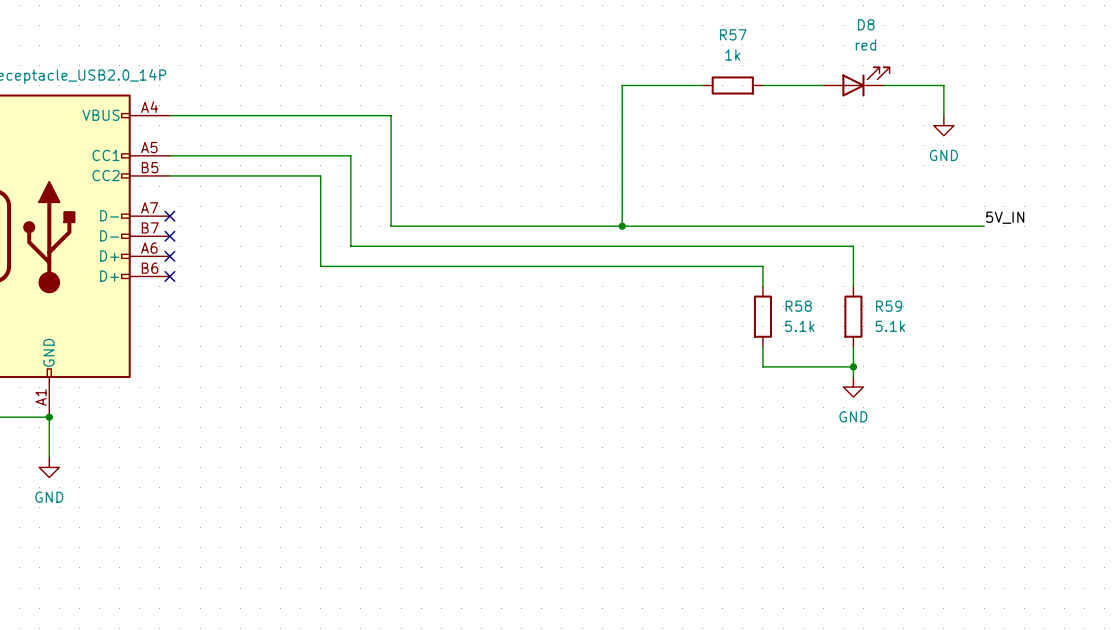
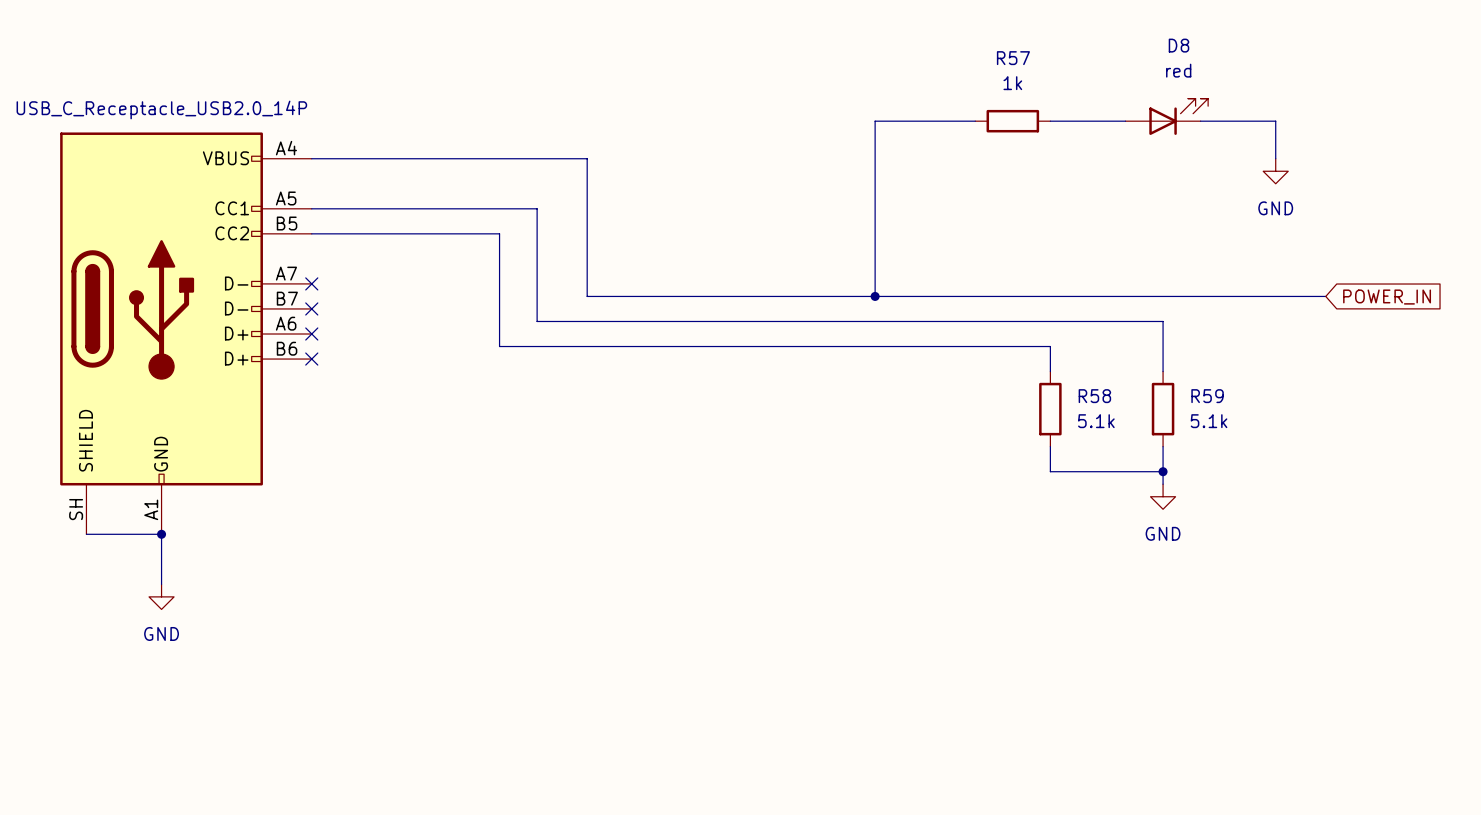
label: 5V_IN (1005, 217) -> none
global label: none -> POWER_IN (1387, 297)

